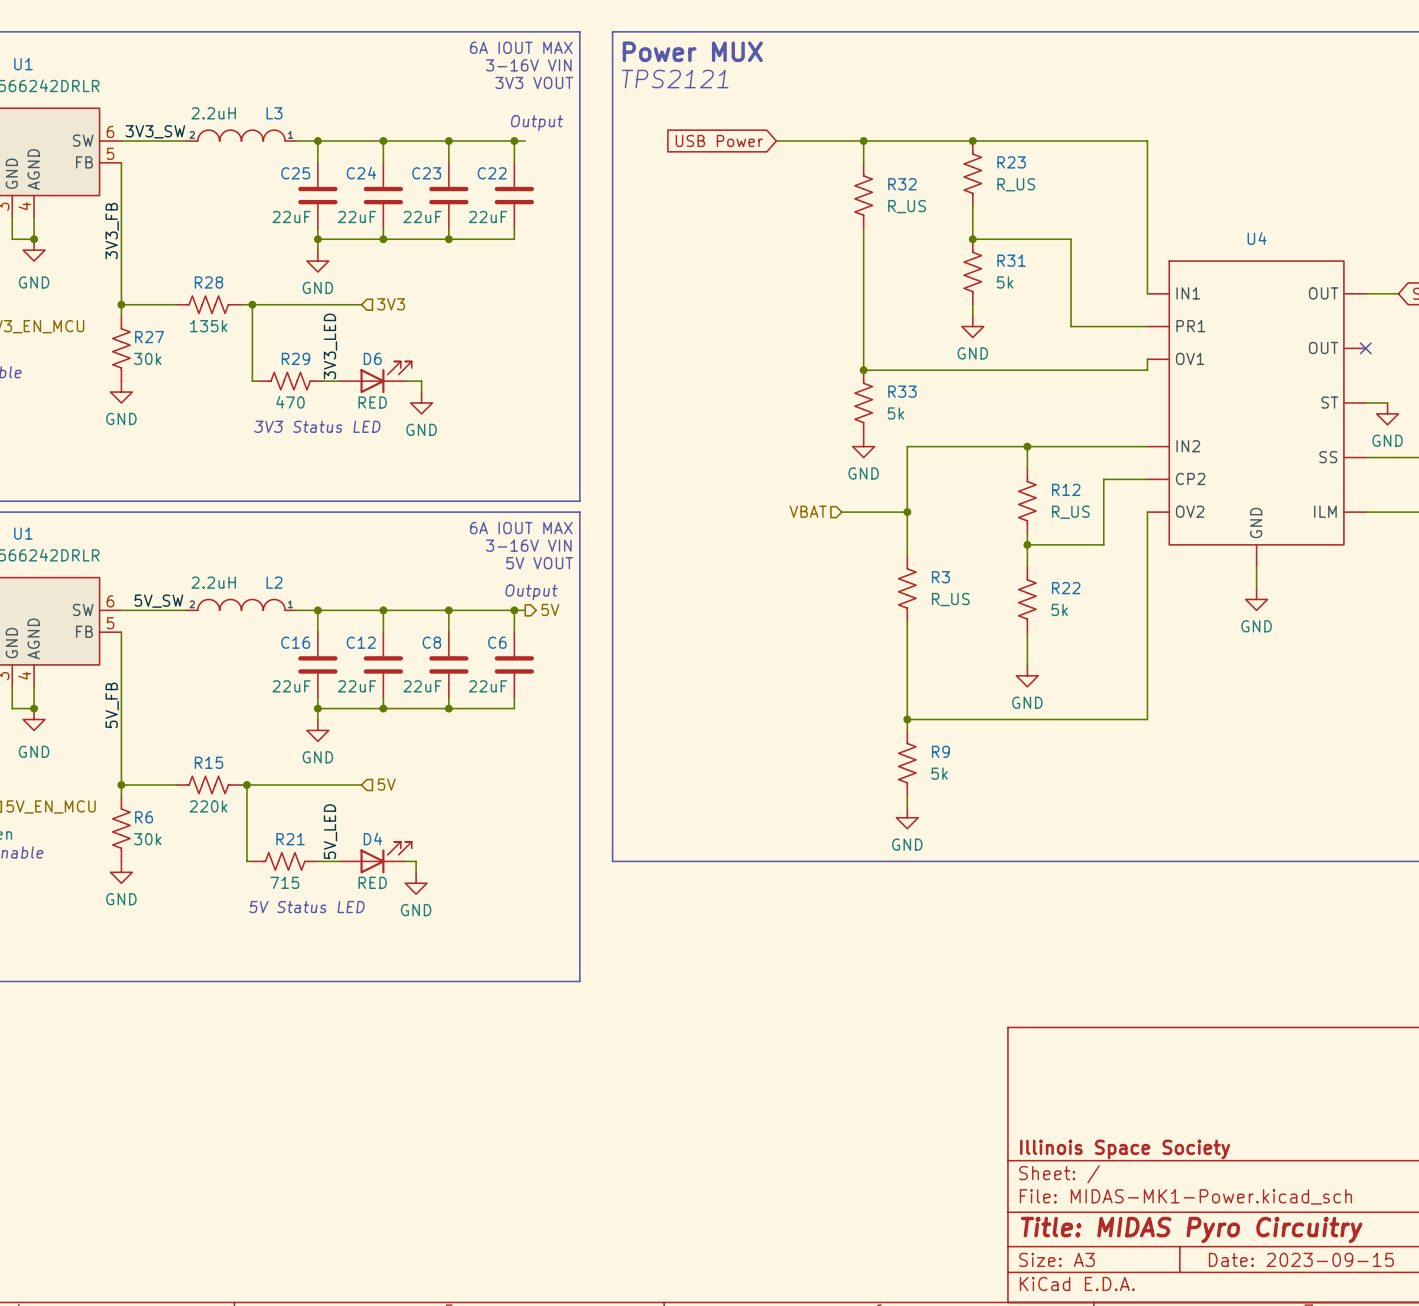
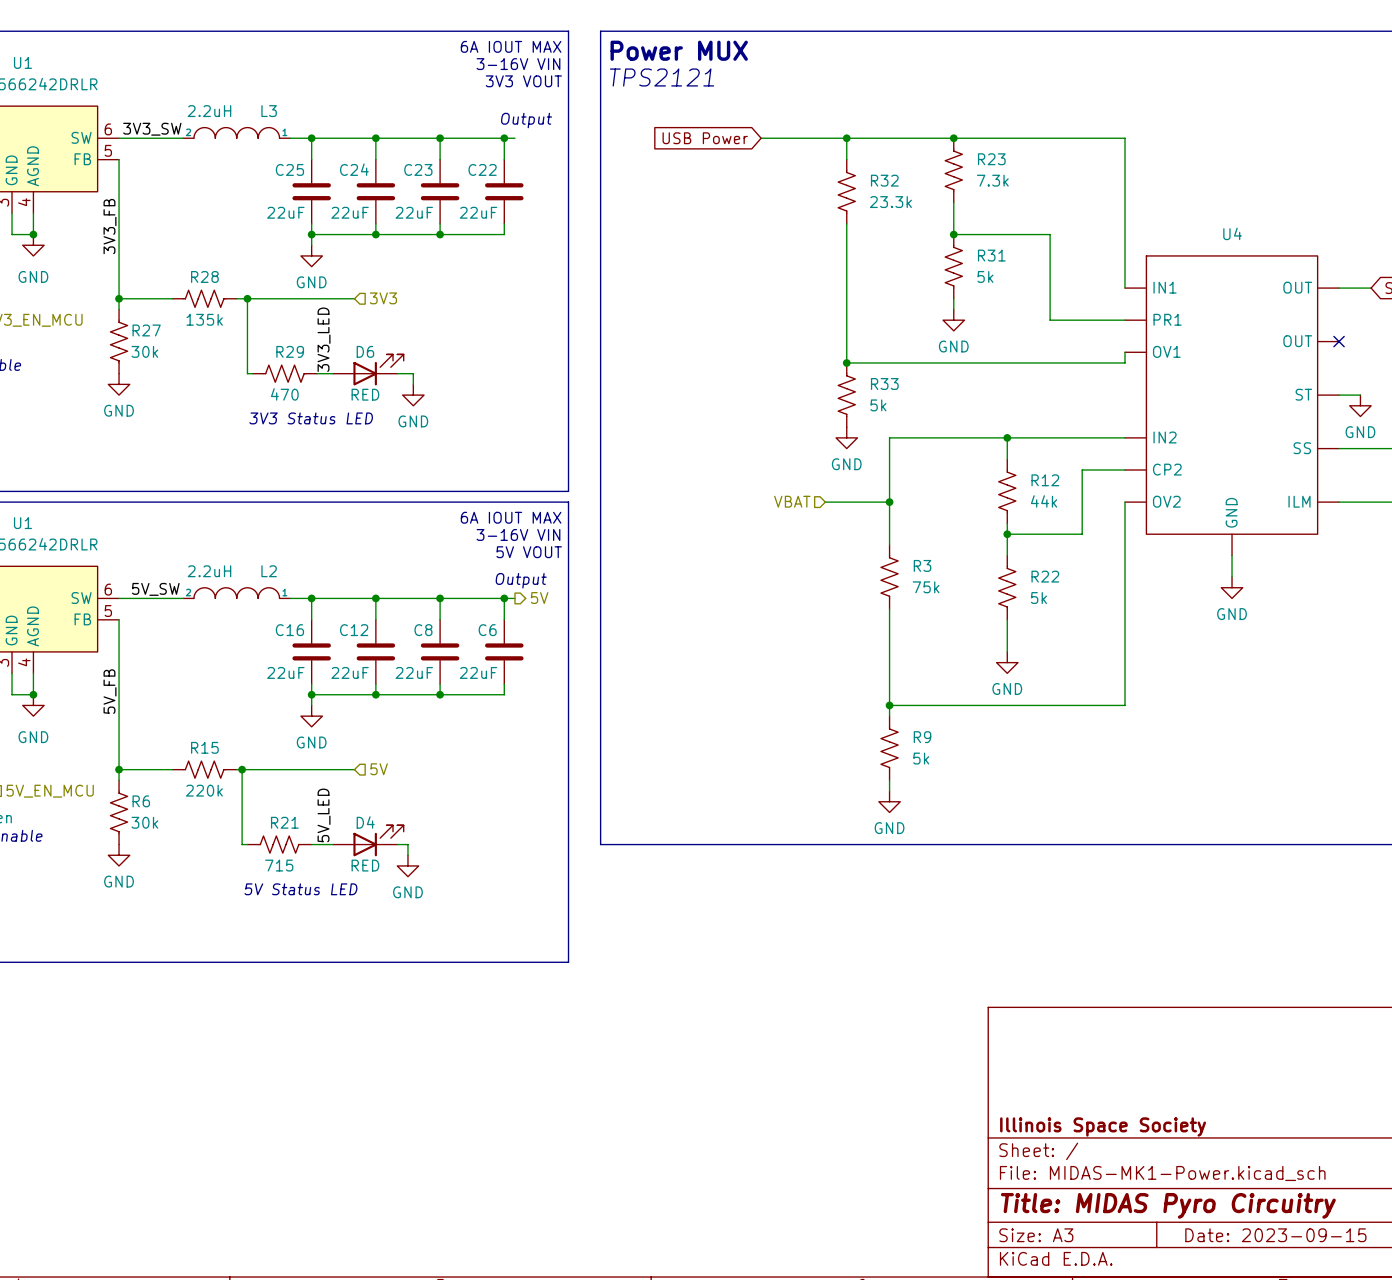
R23 value: R_US (1016, 184) -> 7.3k (992, 180)
R32 value: R_US (907, 206) -> 23.3k (890, 202)
R12 value: R_US (1070, 512) -> 44k (1044, 501)
R3 value: R_US (950, 599) -> 75k (926, 587)

